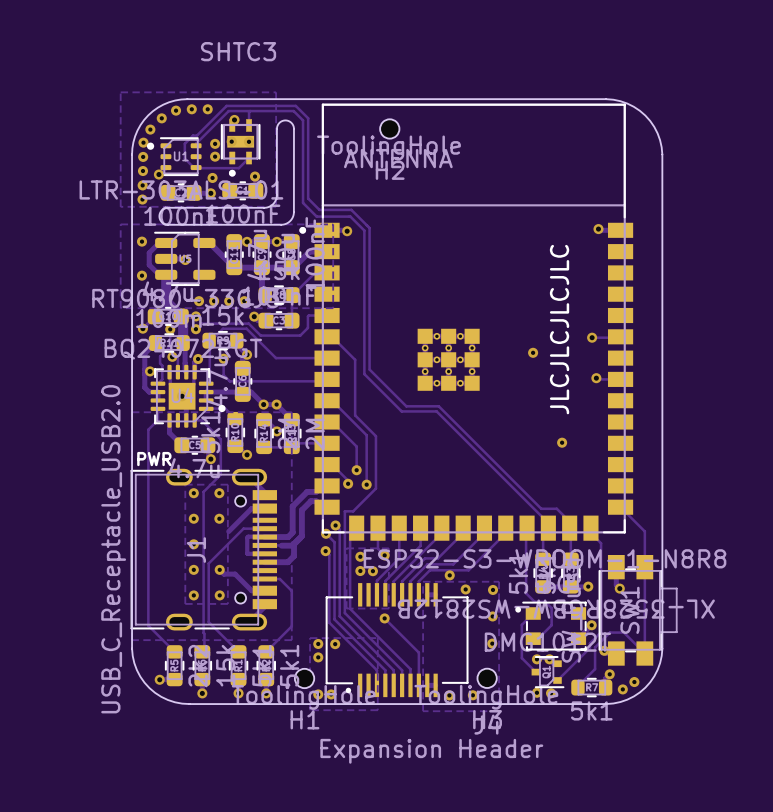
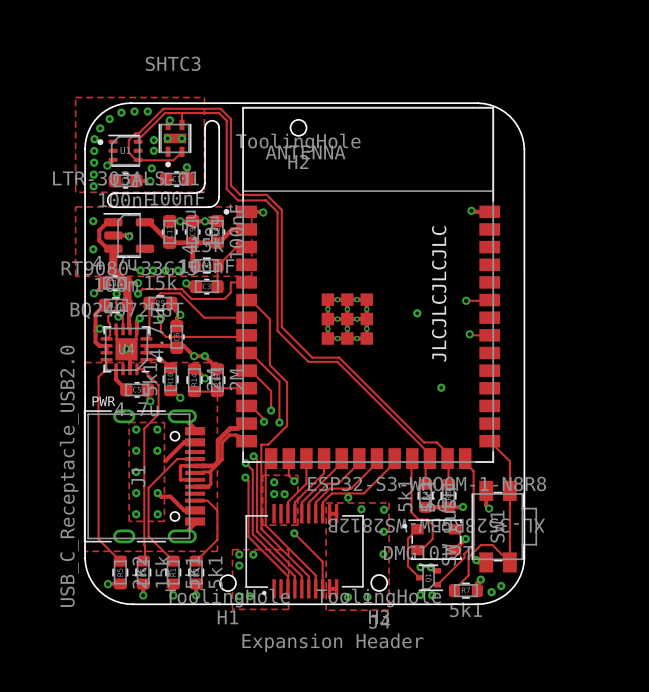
track: (316, 501) (310, 501) (301, 510) (301, 536) (294, 544) (294, 556) (287, 562) (280, 562) -> (237, 436) (229, 435) (222, 442) (222, 459) (209, 472) (203, 472)
track: (300, 537) (292, 545) (274, 545) -> none
track: none -> (210, 471) (210, 484) (208, 486)

